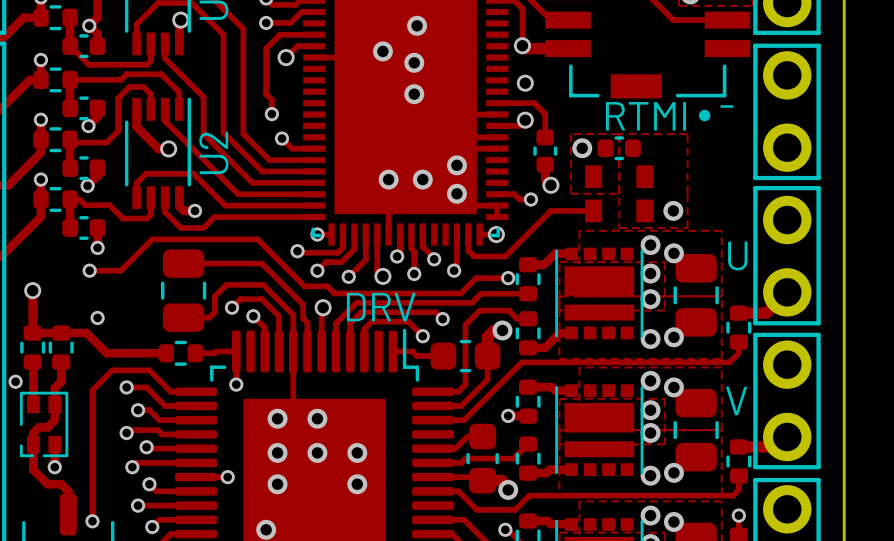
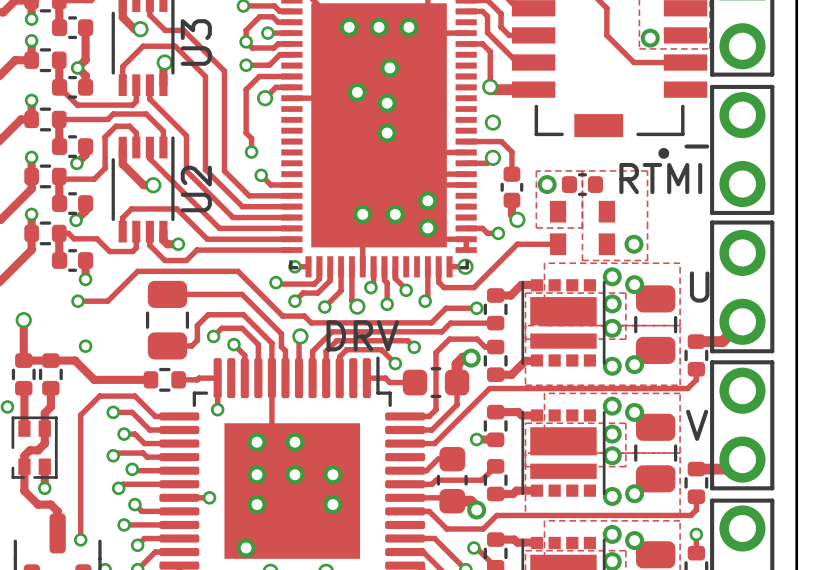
text position: RTMI (646, 116) -> RTMI (660, 178)

